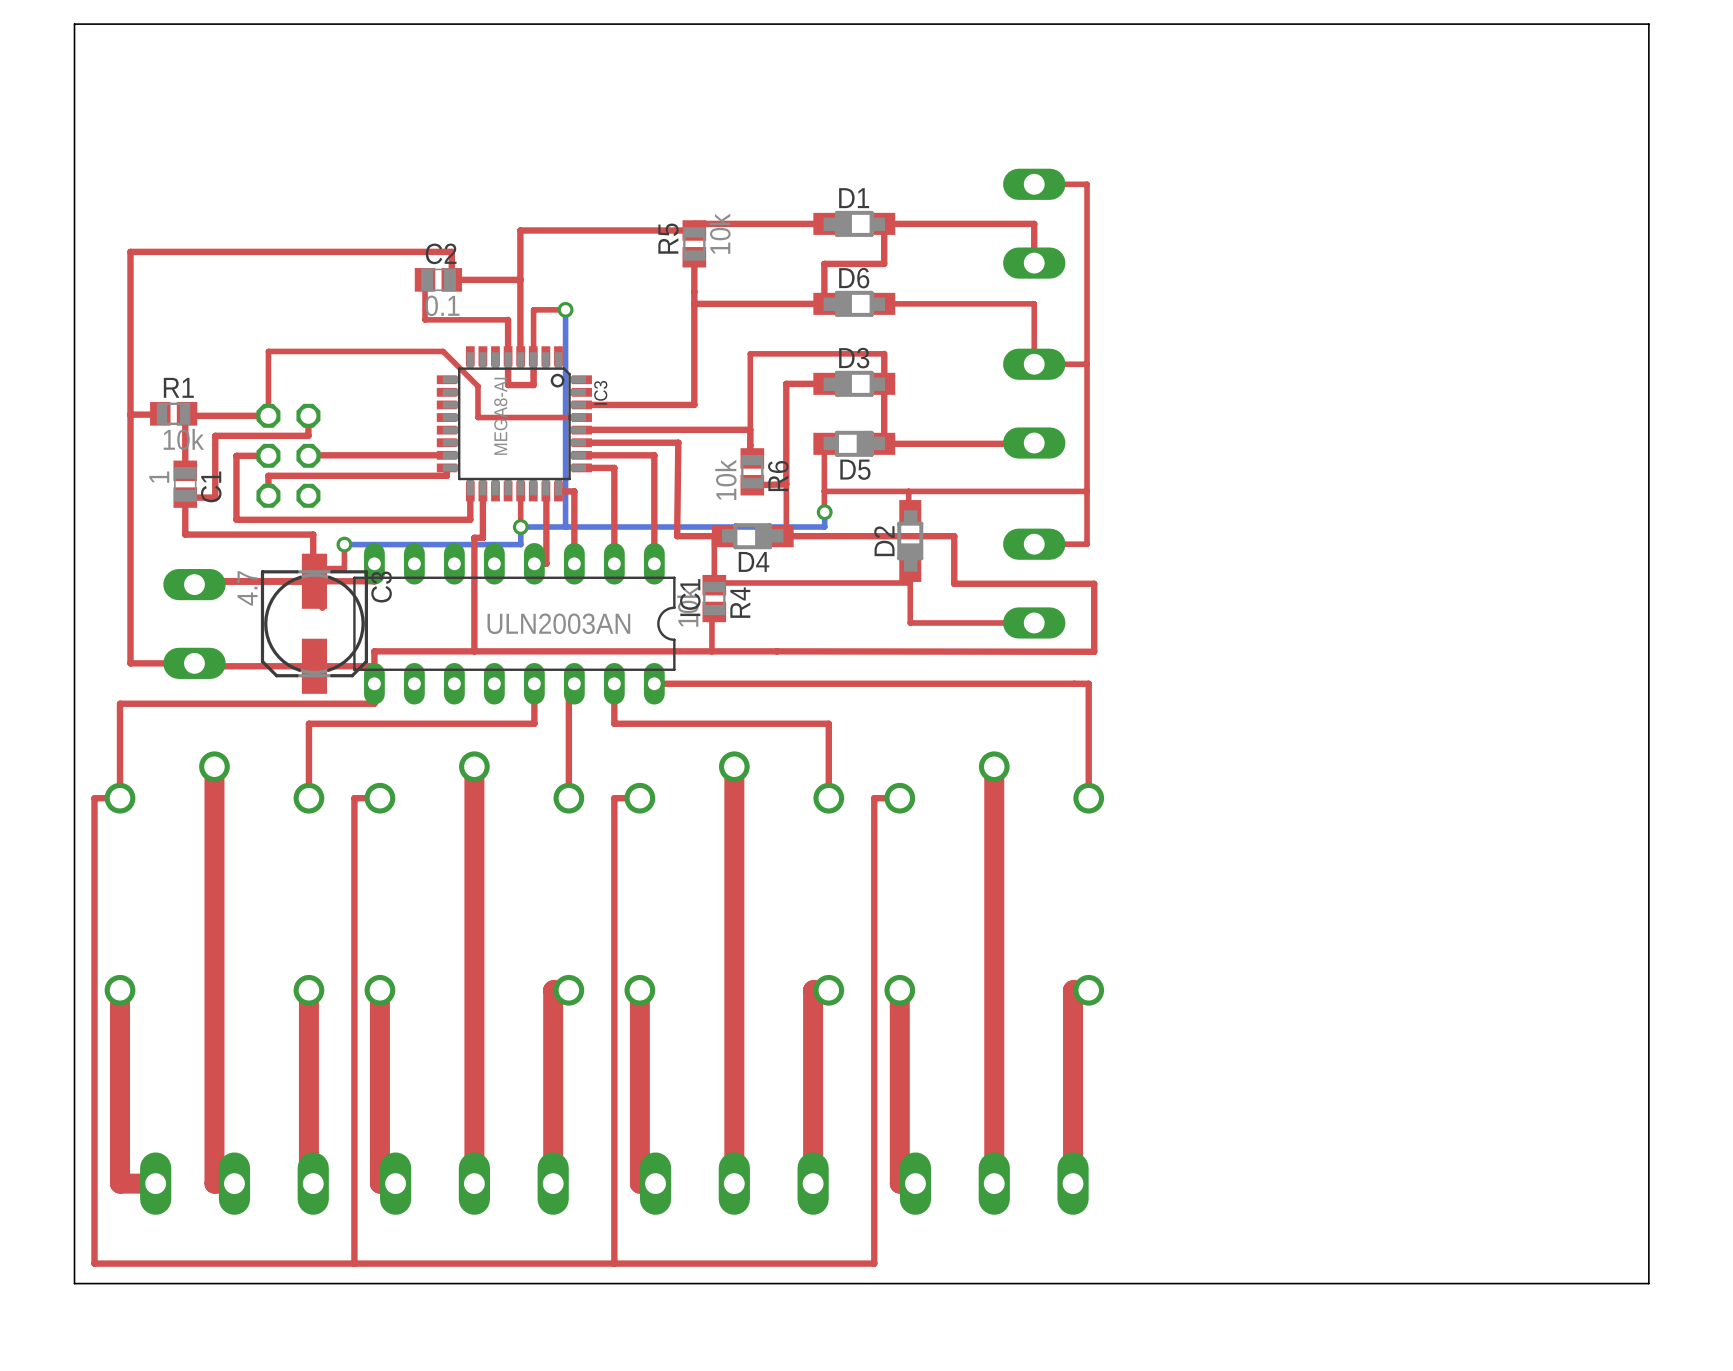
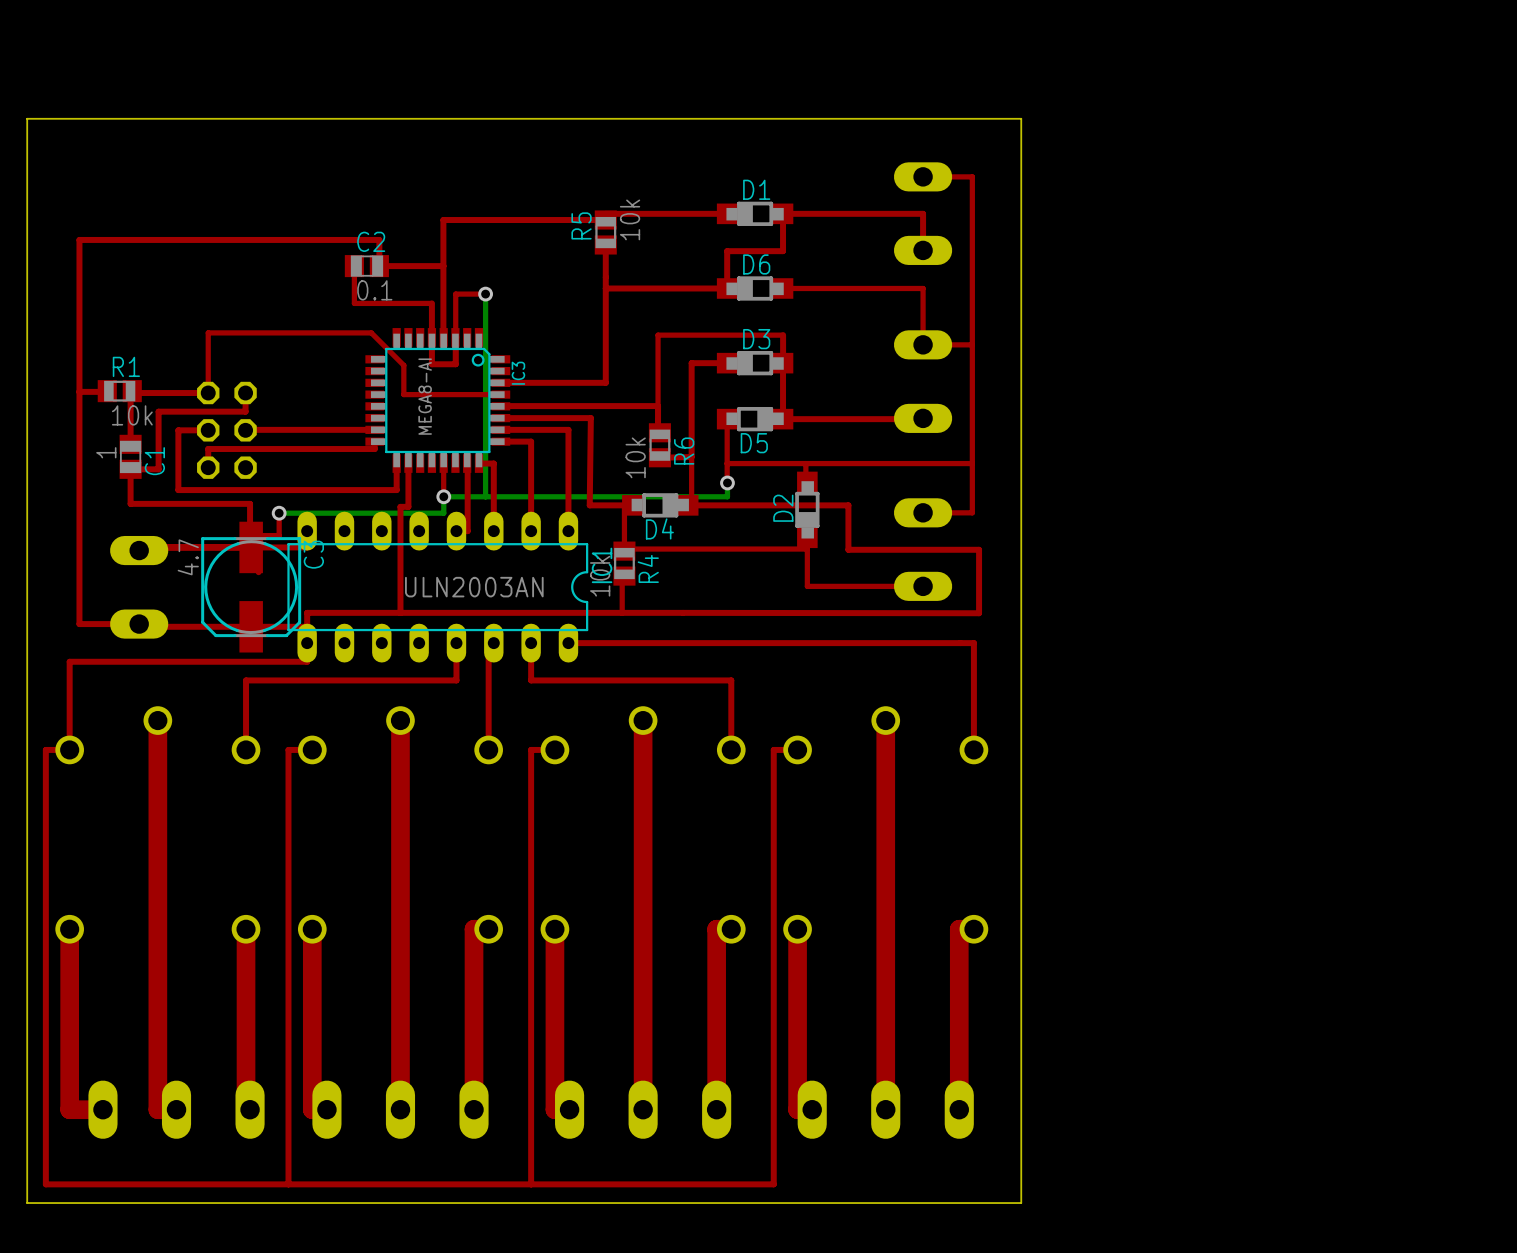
board edge: (74, 122) (74, 24) (1648, 24) (1648, 1283) (1139, 1283) -> (27, 118) (1021, 118) (1021, 1203)

